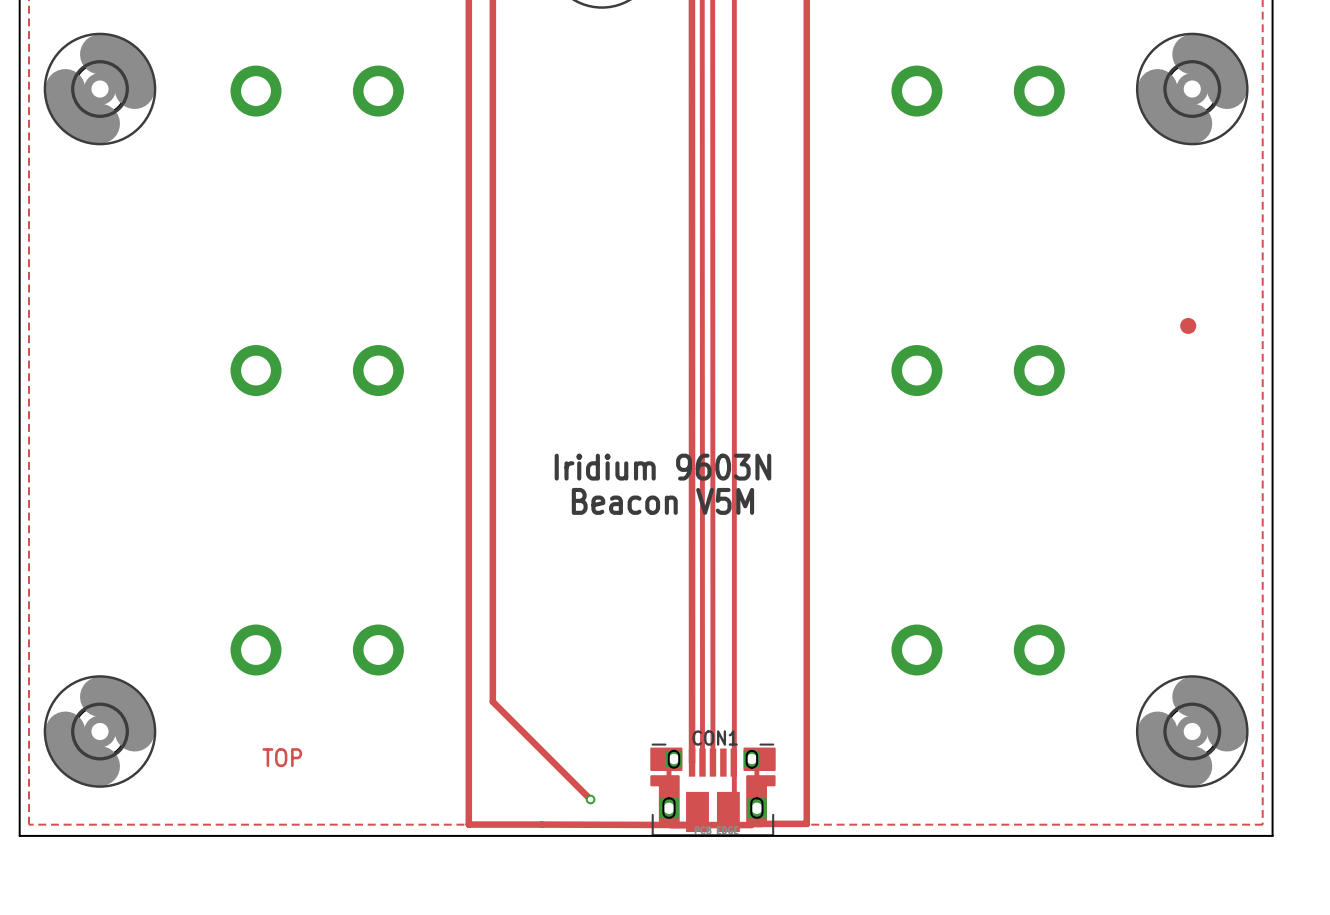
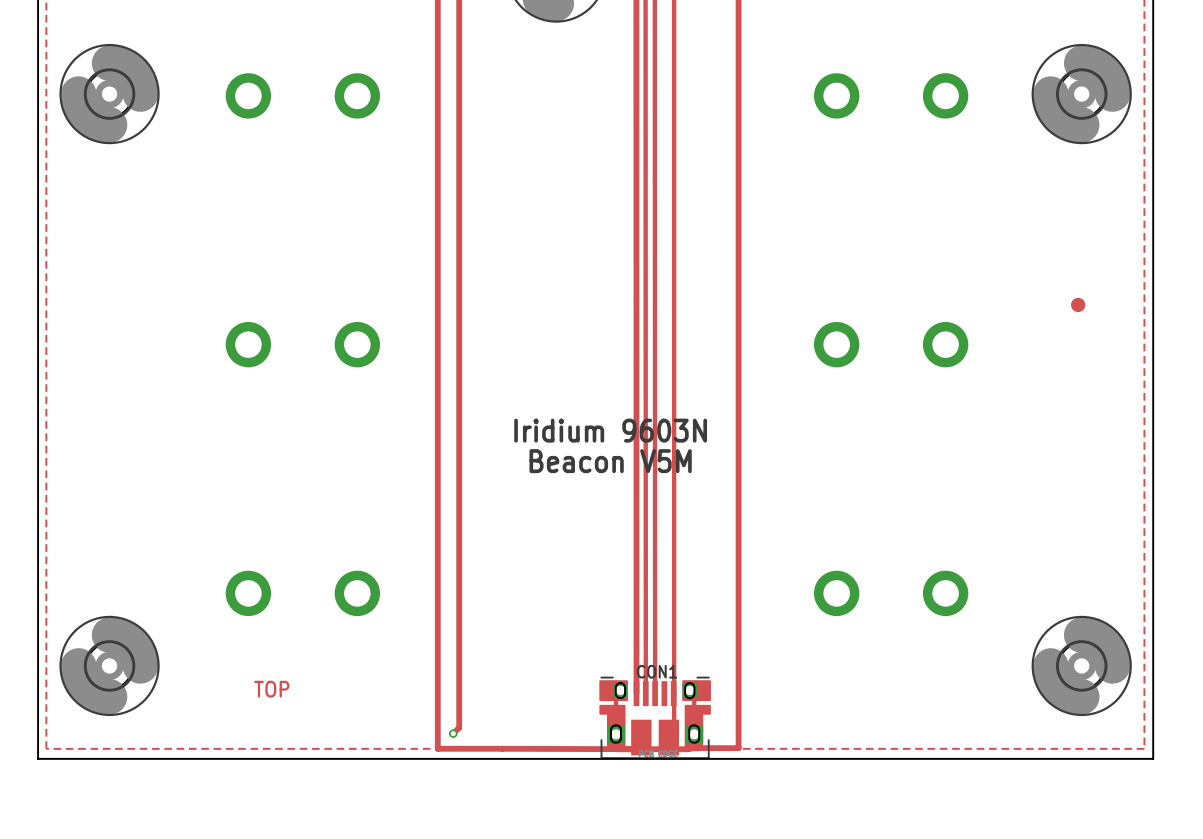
track: (492, 701) (590, 799) -> (459, 639) (459, 727) (453, 733)
via: (590, 799) -> none
via: none -> (453, 733)

